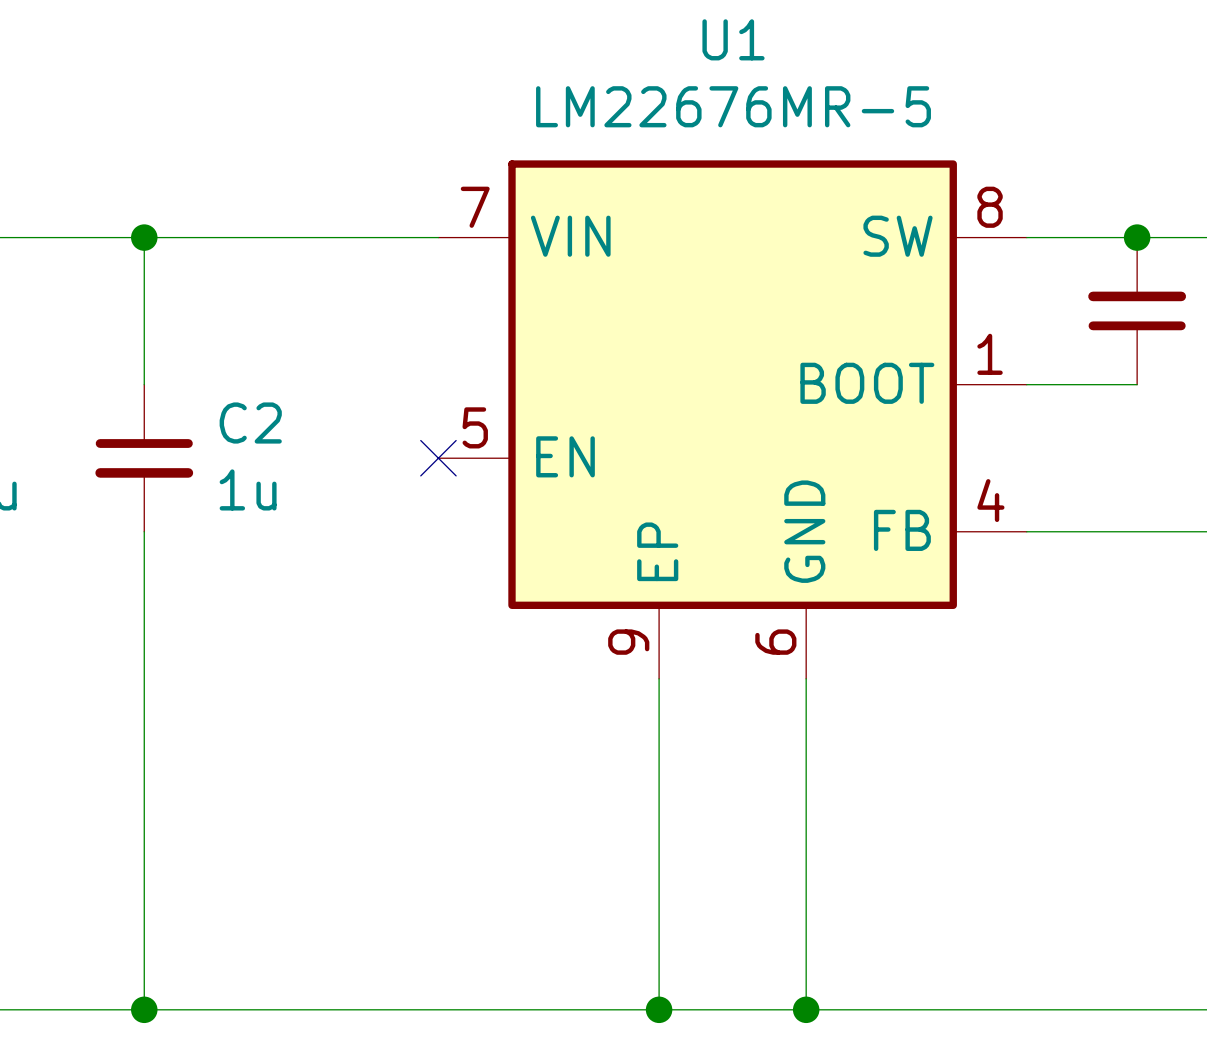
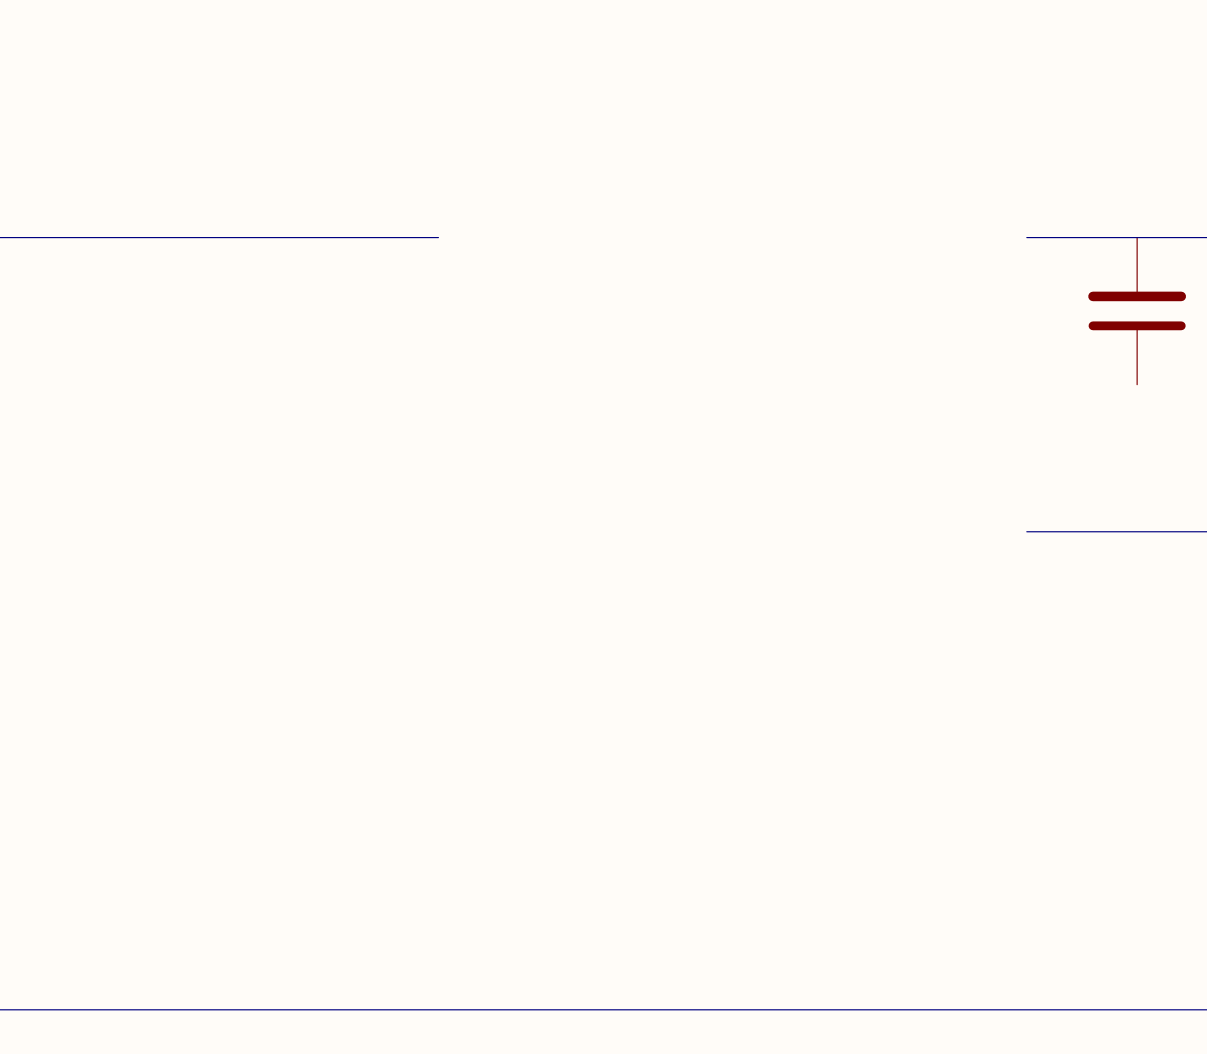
wire: (144, 237) (144, 384) -> none
junction: (144, 237) -> none
junction: (1137, 237) -> none
wire: (1026, 384) (1137, 384) -> none
U1: LM22676MR-5 (732, 419) -> none
C2: 1u (144, 458) -> none
no-connect mark: (438, 458) -> none
wire: (144, 531) (144, 1009) -> none
wire: (659, 678) (659, 1009) -> none
wire: (806, 678) (806, 1009) -> none
junction: (144, 1009) -> none
junction: (659, 1009) -> none
junction: (806, 1009) -> none

